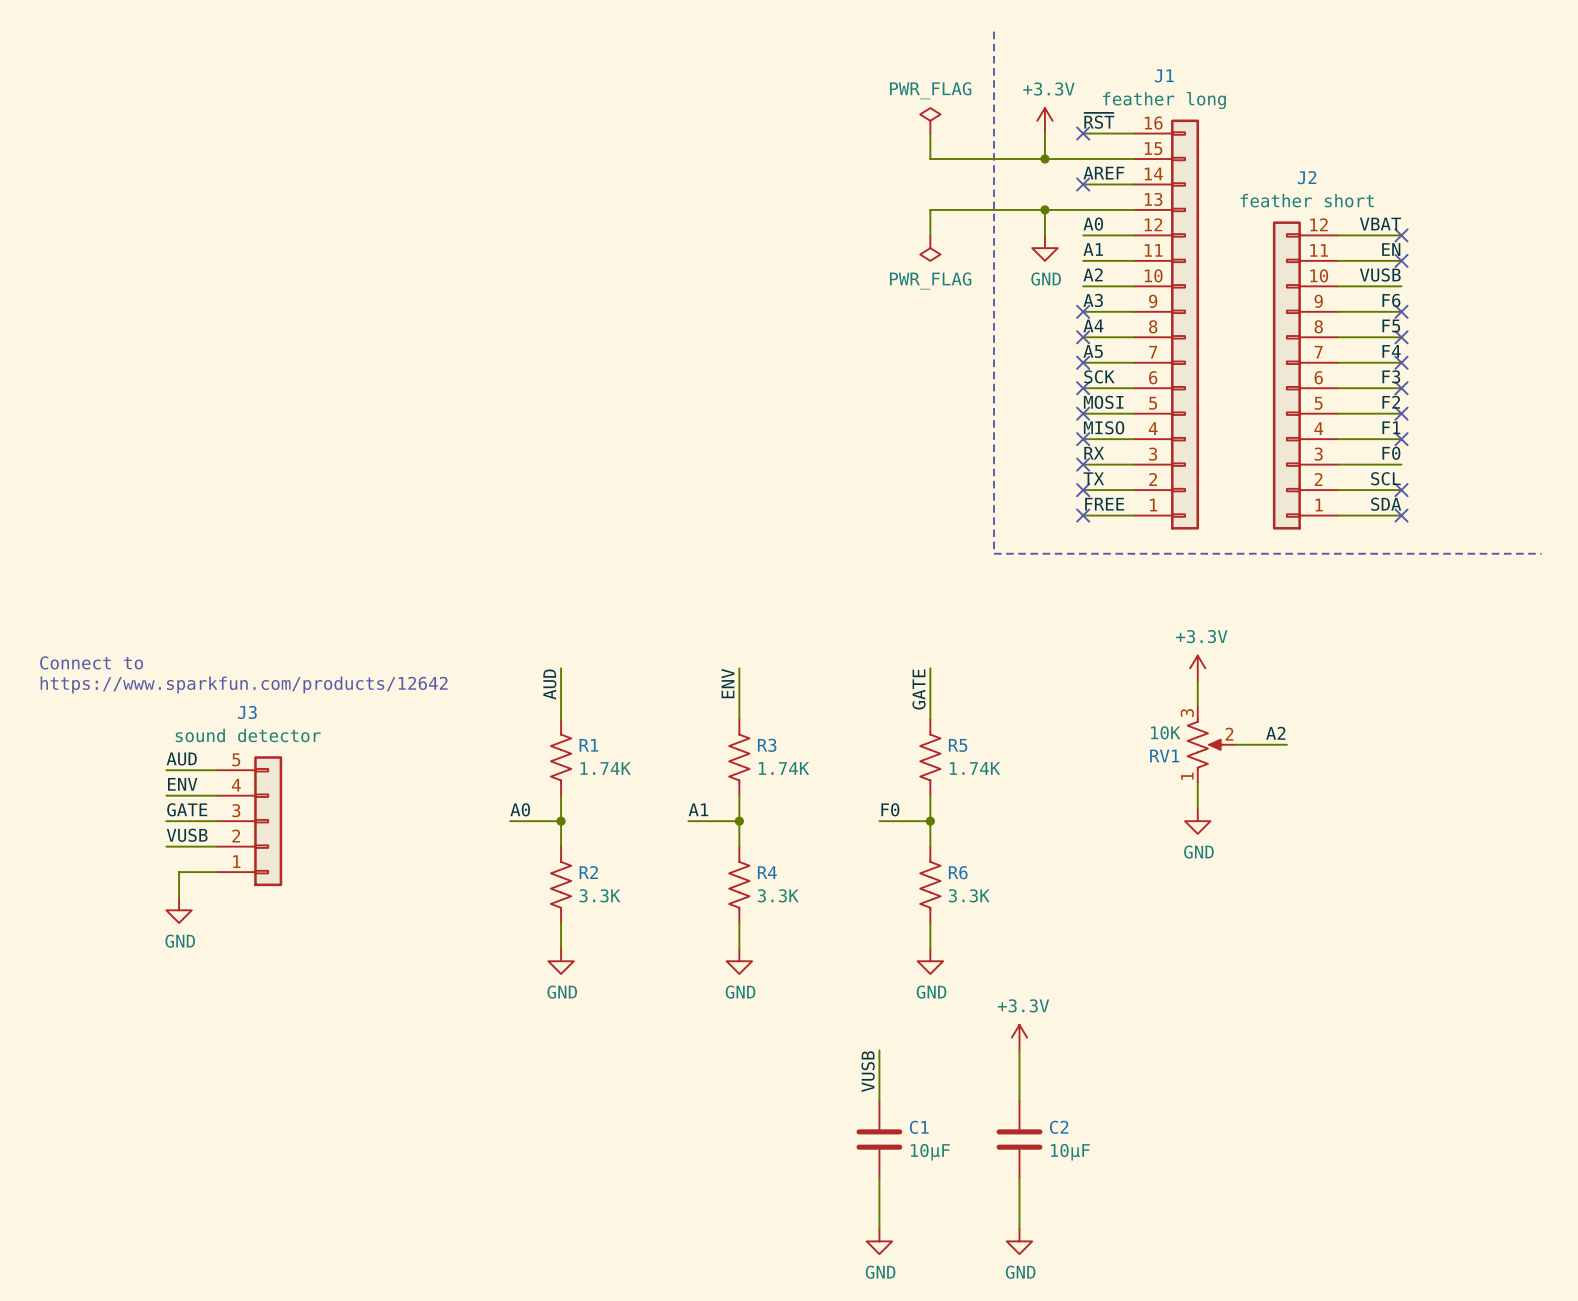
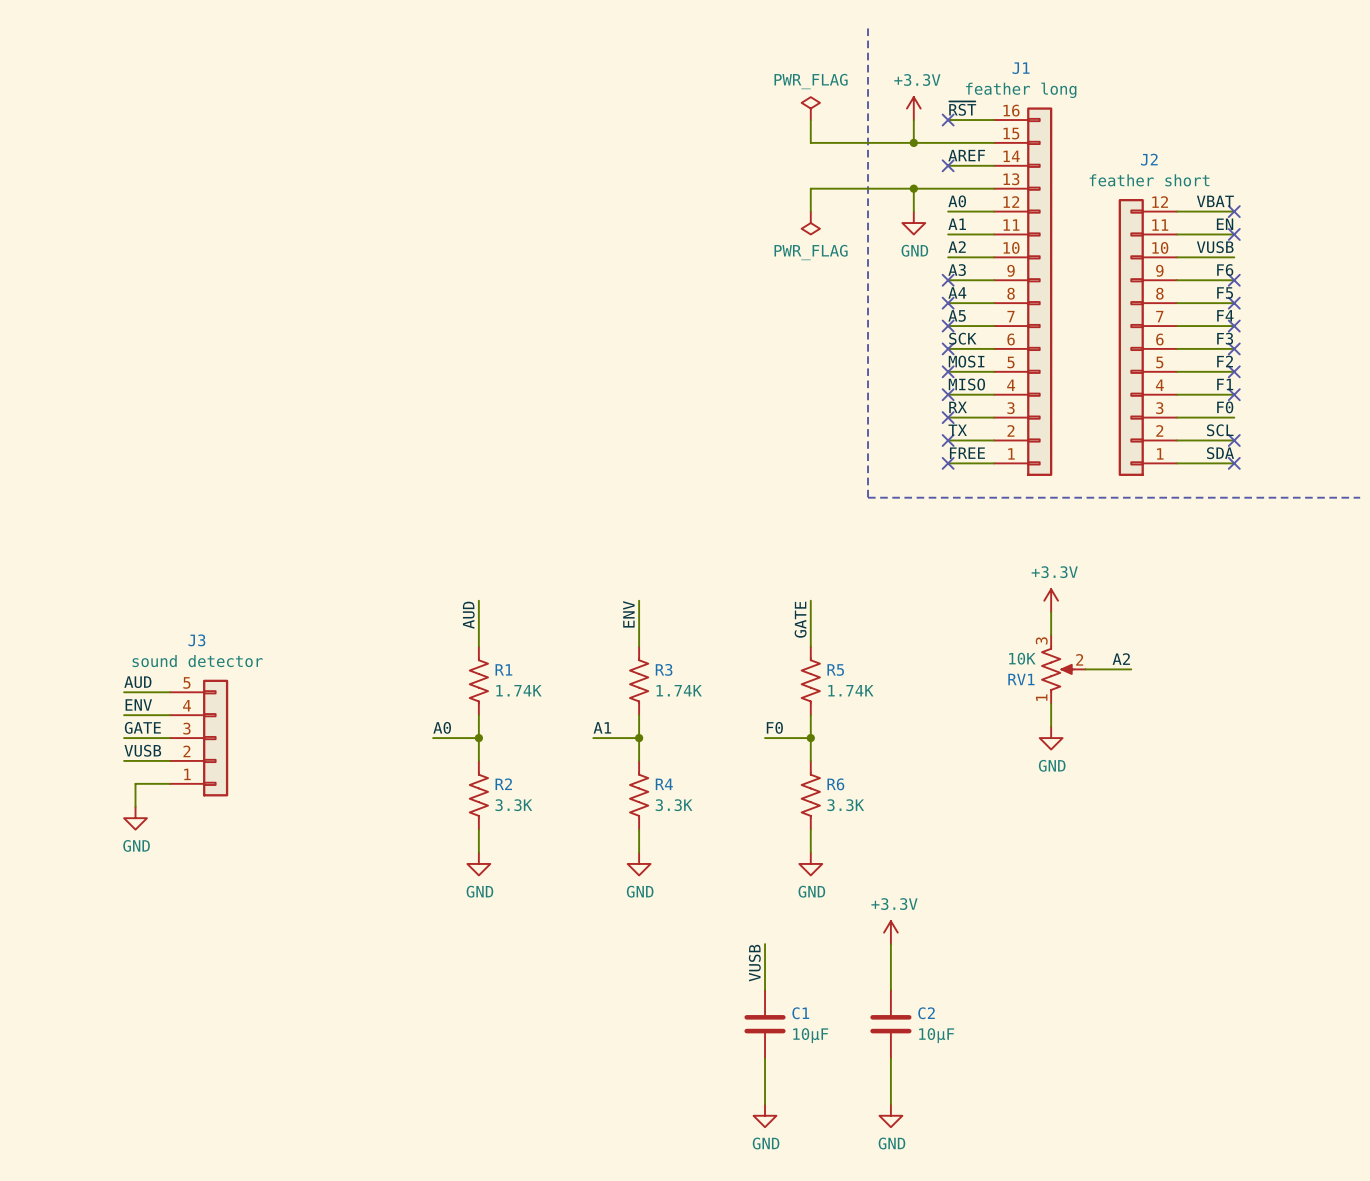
text: Connect to (91, 662) -> none
text: https://www.sparkfun.com/products/12642 (244, 684) -> none

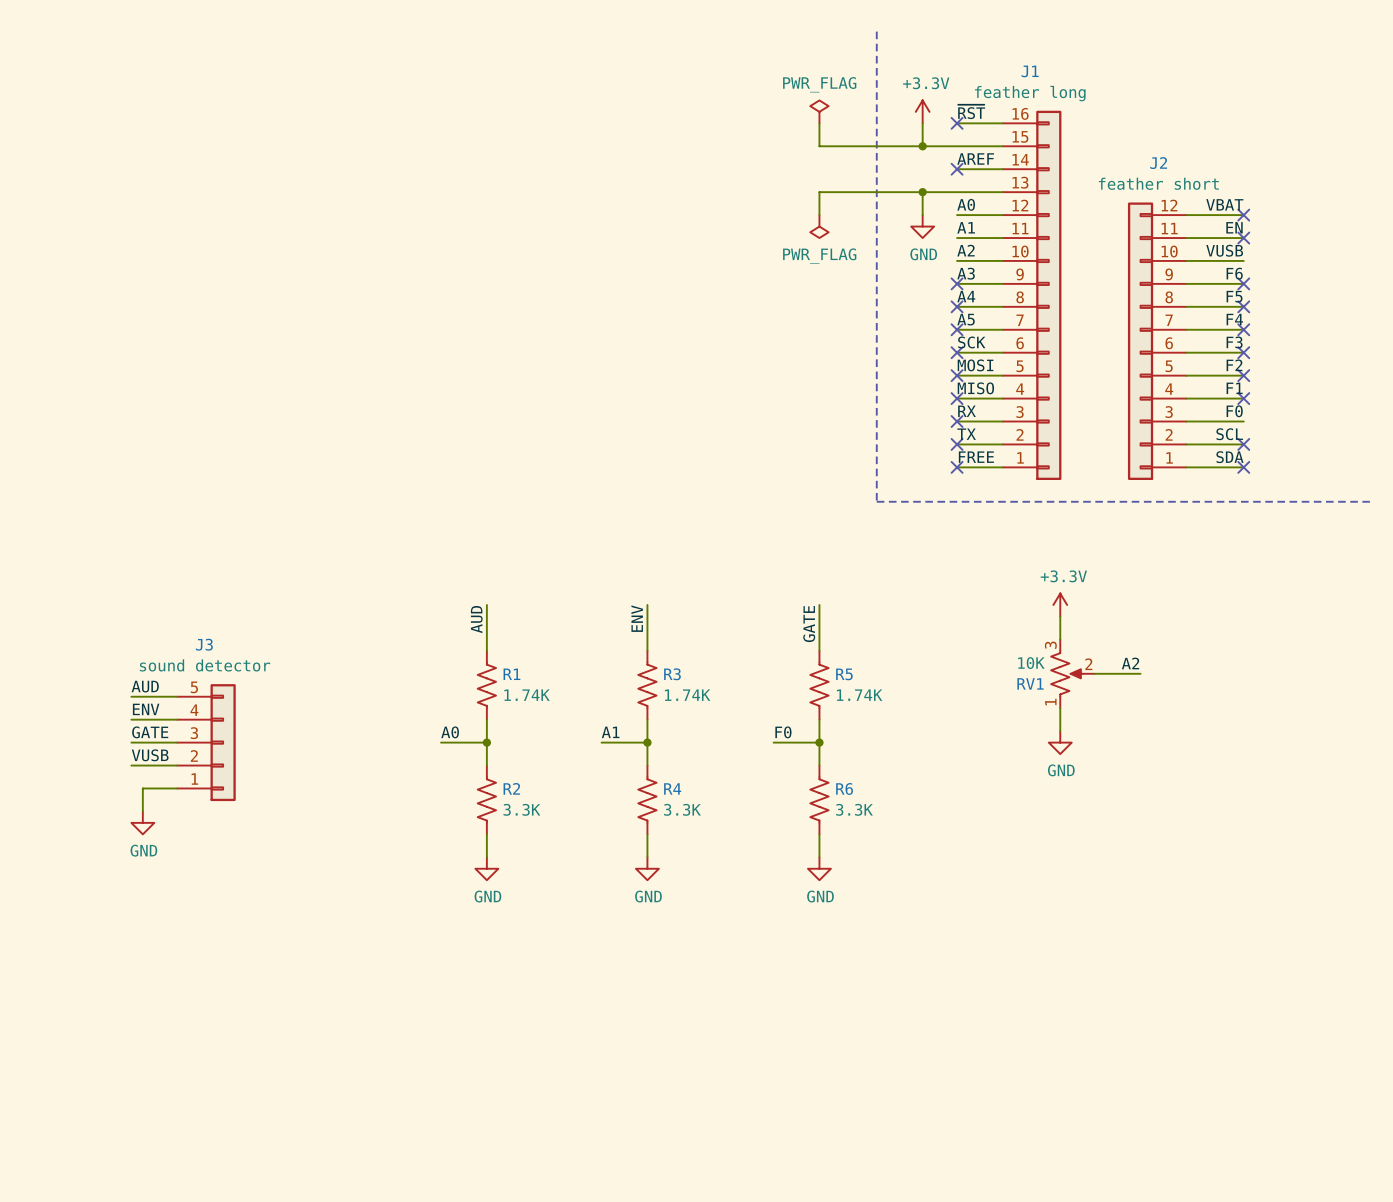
power symbol: +3.3V (890, 932) -> none
wire: (765, 944) (765, 989) -> none
wire: (890, 944) (890, 989) -> none
label: VUSB (754, 963) -> none
C1: 10μF (765, 1024) -> none
C2: 10μF (890, 1024) -> none
wire: (765, 1058) (765, 1104) -> none
wire: (890, 1058) (890, 1104) -> none
power symbol: GND (765, 1115) -> none
power symbol: GND (890, 1115) -> none

